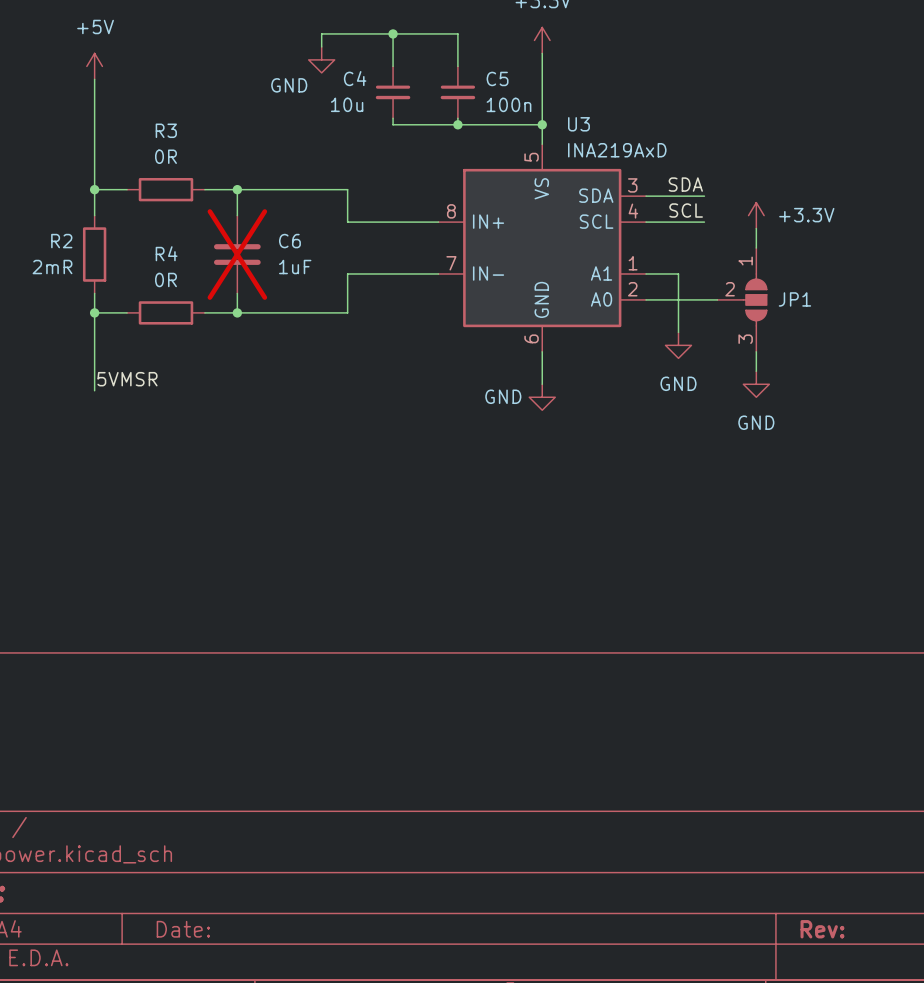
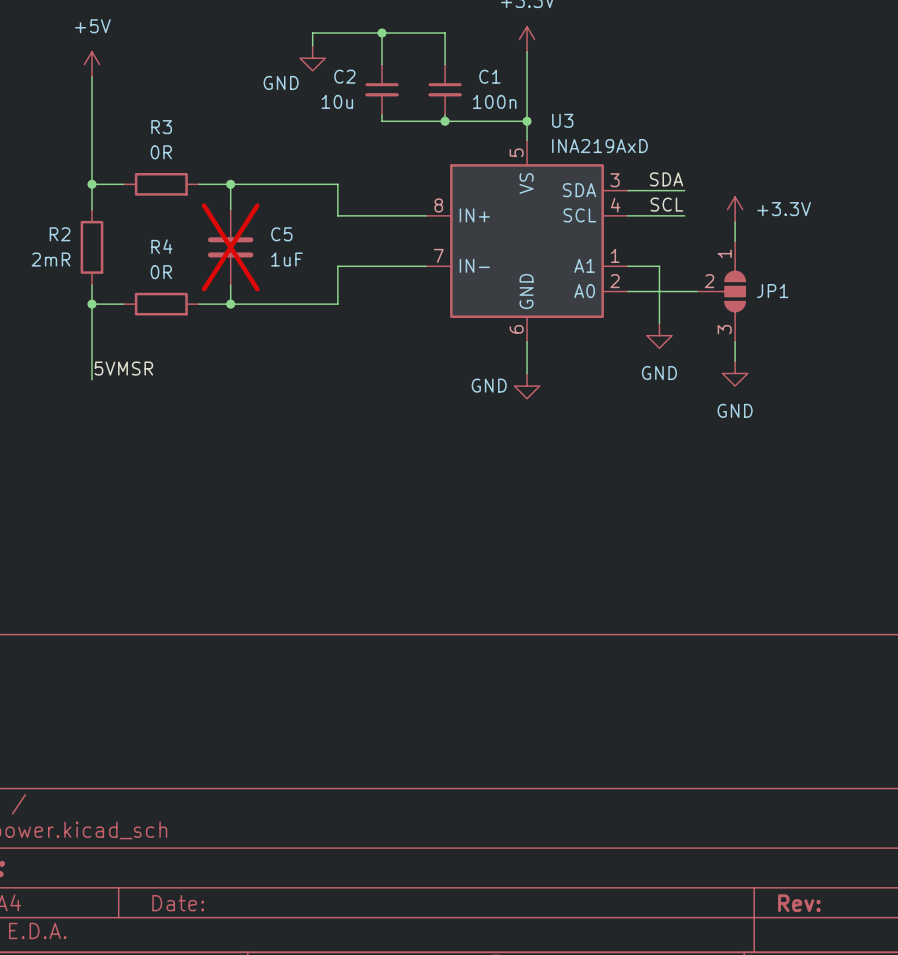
C4 name: C4 (355, 78) -> C2 (344, 76)
C5 name: C5 (497, 78) -> C1 (489, 76)
C6 name: C6 (289, 241) -> C5 (281, 234)

